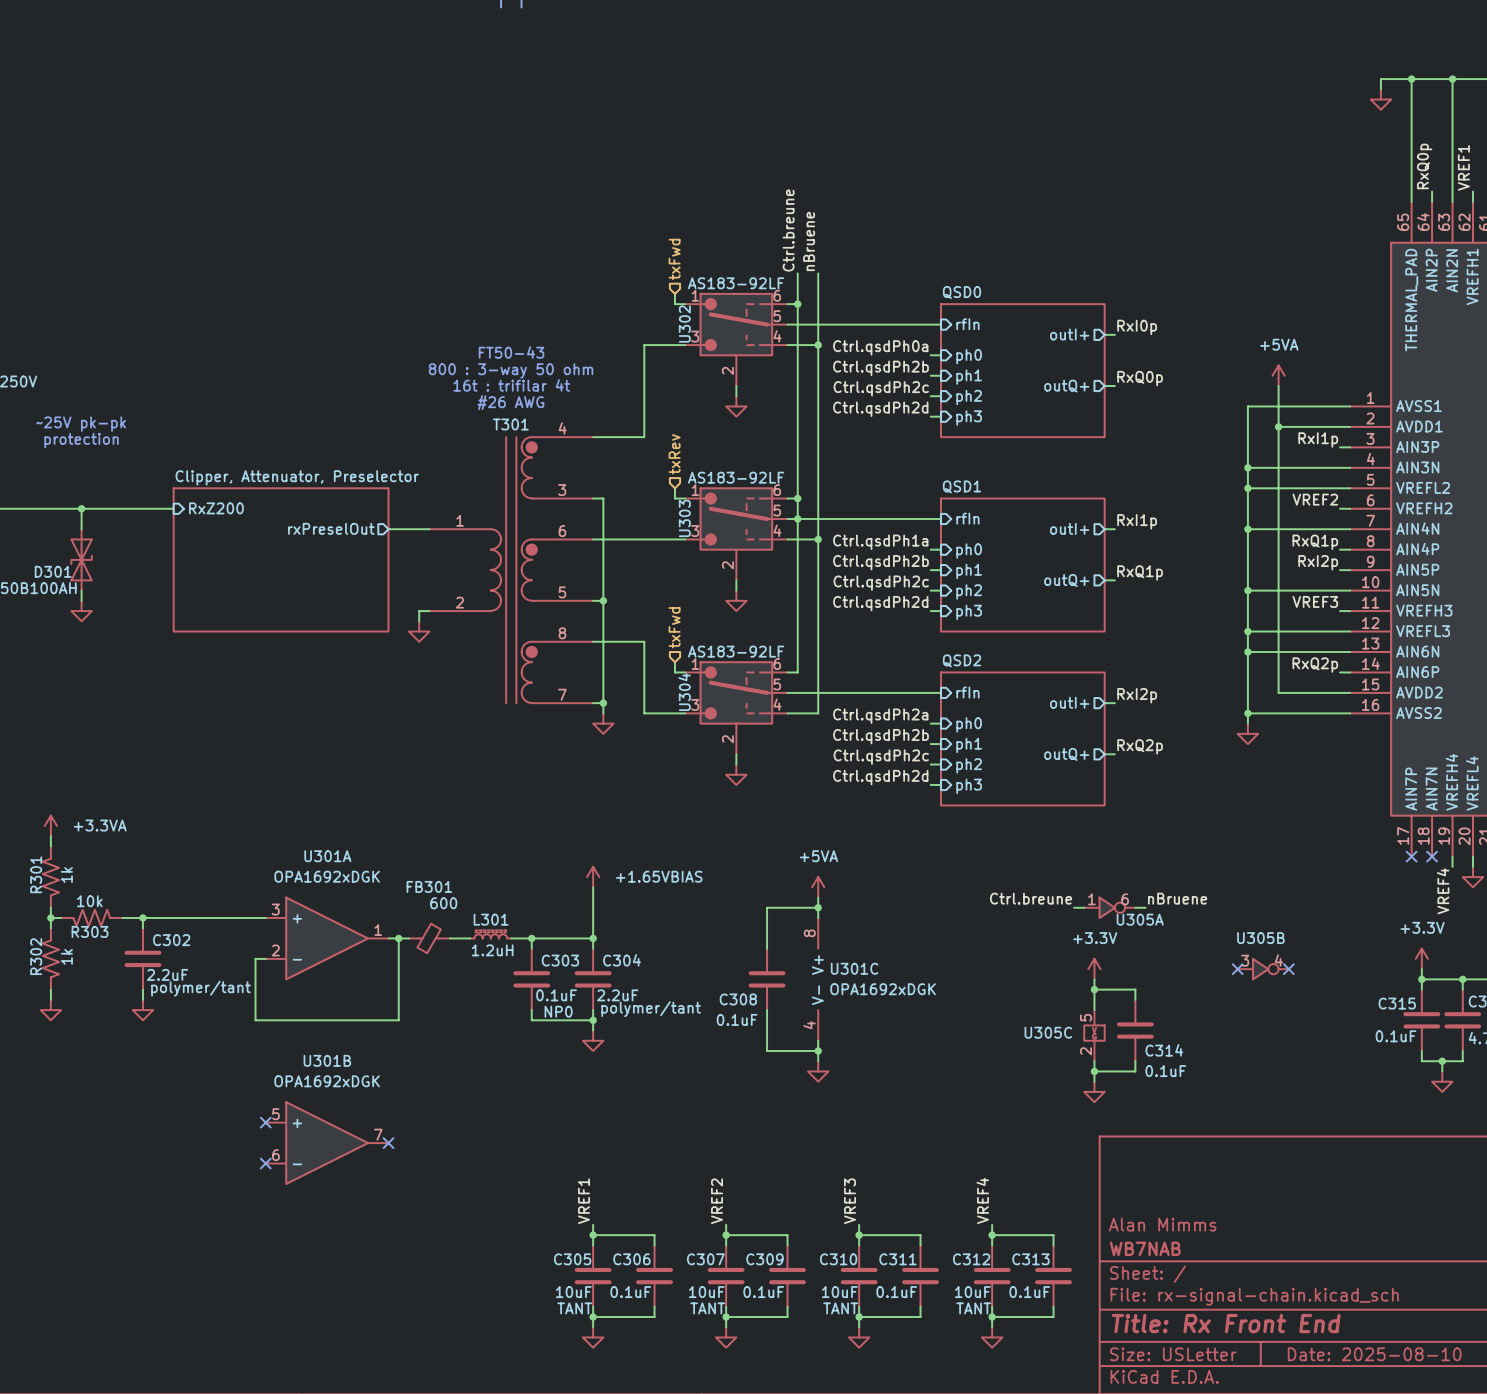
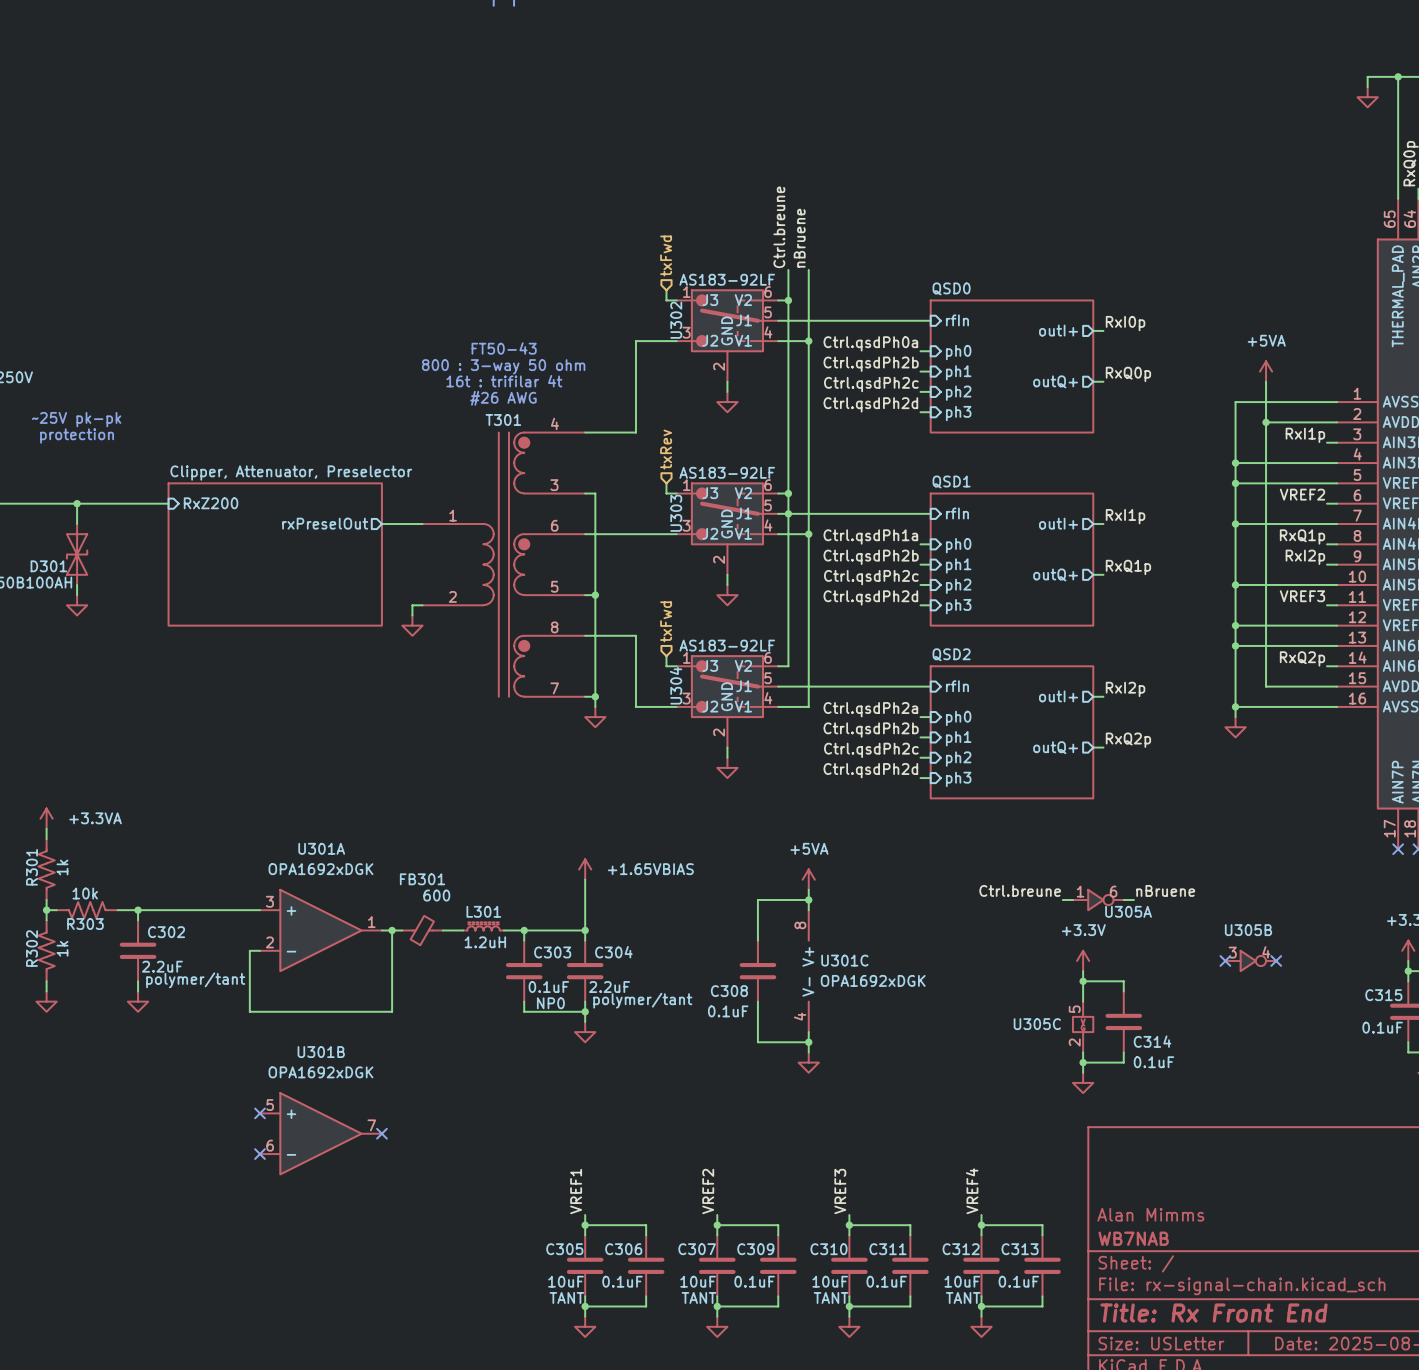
U302 pin name: none -> J3 (710, 300)
U302 pin name: none -> V2 (743, 300)
U302 pin name: none -> J1 (744, 320)
U302 pin name: none -> GND (727, 330)
U302 pin name: none -> J2 (710, 340)
U302 pin name: none -> V1 (743, 340)
U303 pin name: none -> J3 (710, 493)
U303 pin name: none -> V2 (743, 493)
U303 pin name: none -> J1 (744, 513)
U303 pin name: none -> GND (727, 523)
U303 pin name: none -> J2 (710, 533)
U303 pin name: none -> V1 (743, 533)
U304 pin name: none -> J3 (710, 665)
U304 pin name: none -> V2 (743, 665)
U304 pin name: none -> J1 (744, 686)
U304 pin name: none -> GND (727, 696)
U304 pin name: none -> J2 (710, 706)
U304 pin name: none -> V1 (743, 706)

